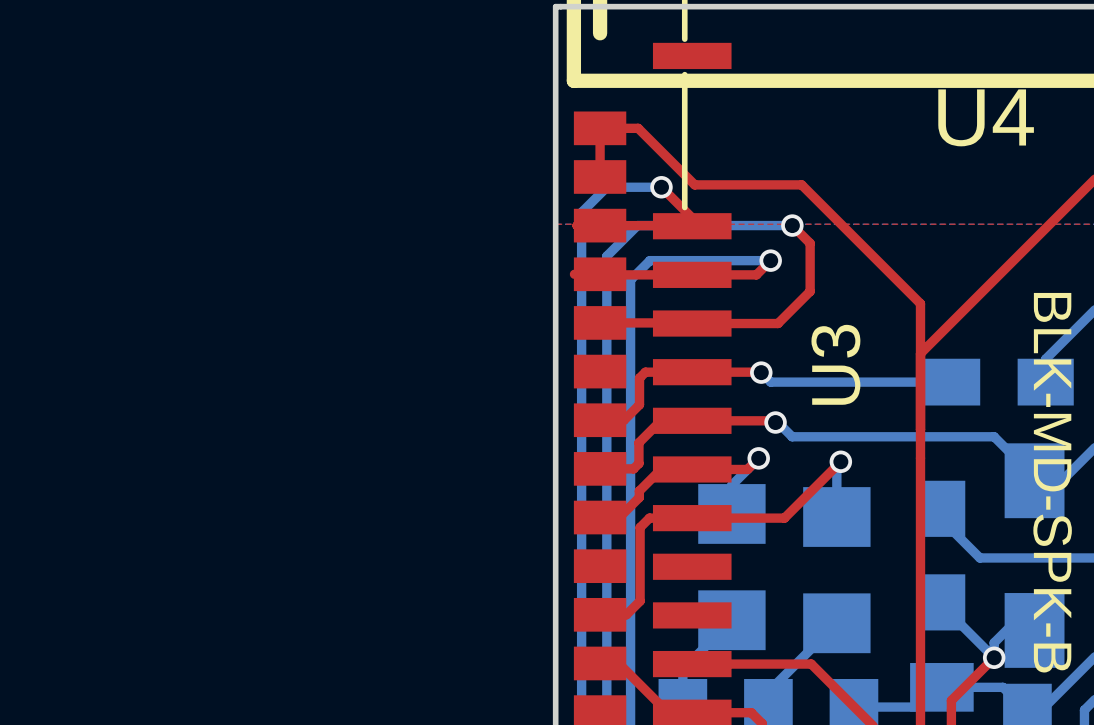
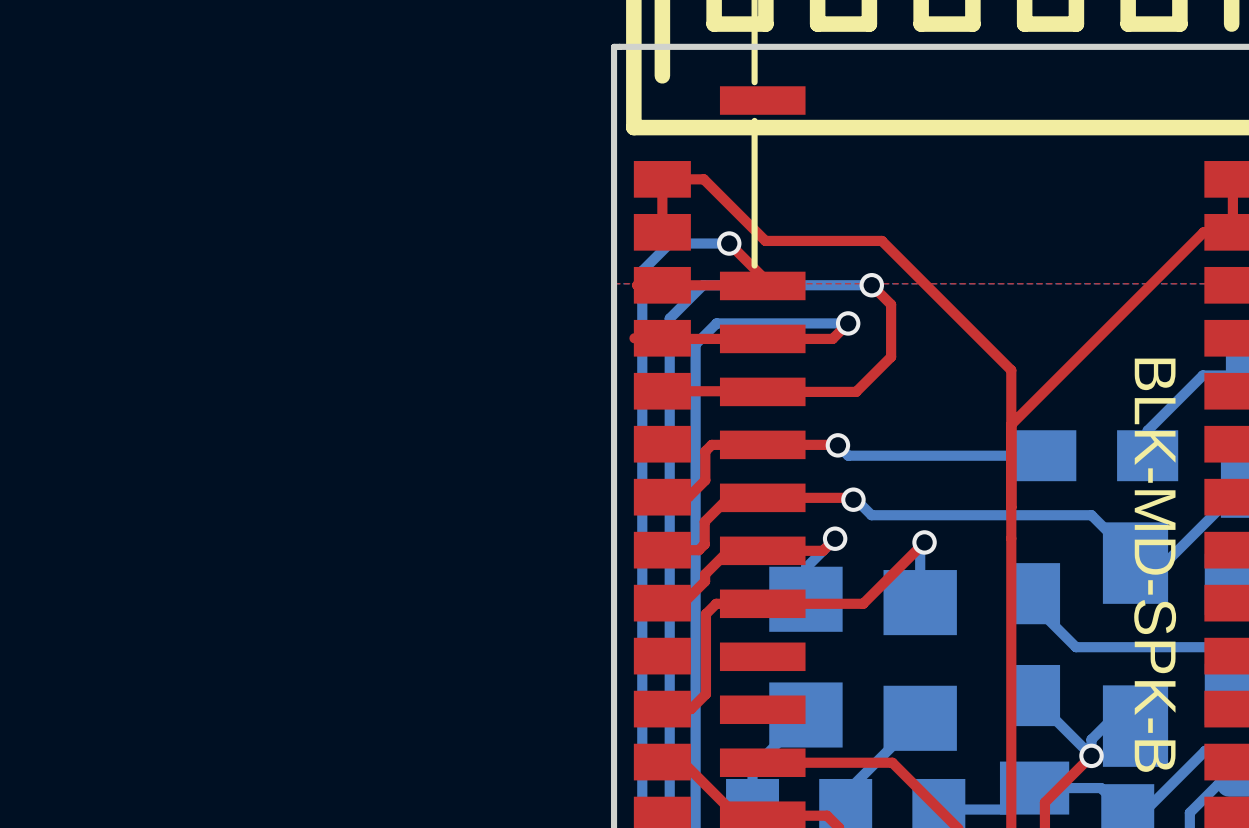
U4 name: U4 (986, 117) -> none
U3 name: U3 (835, 364) -> none

